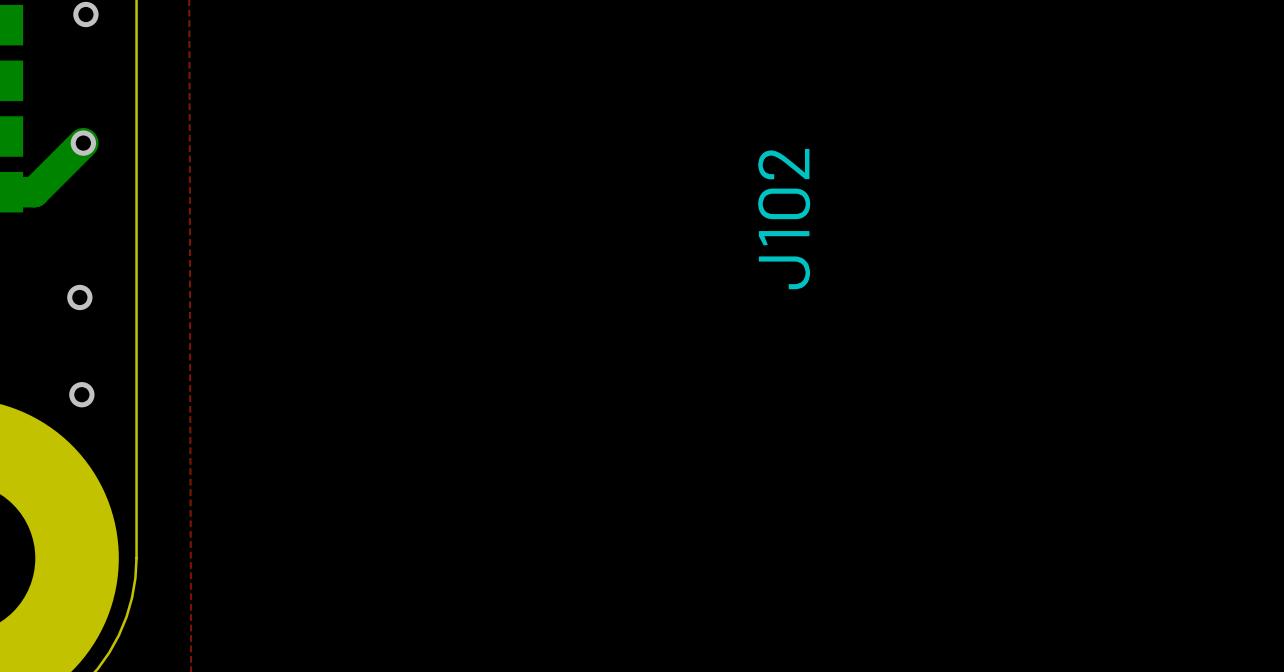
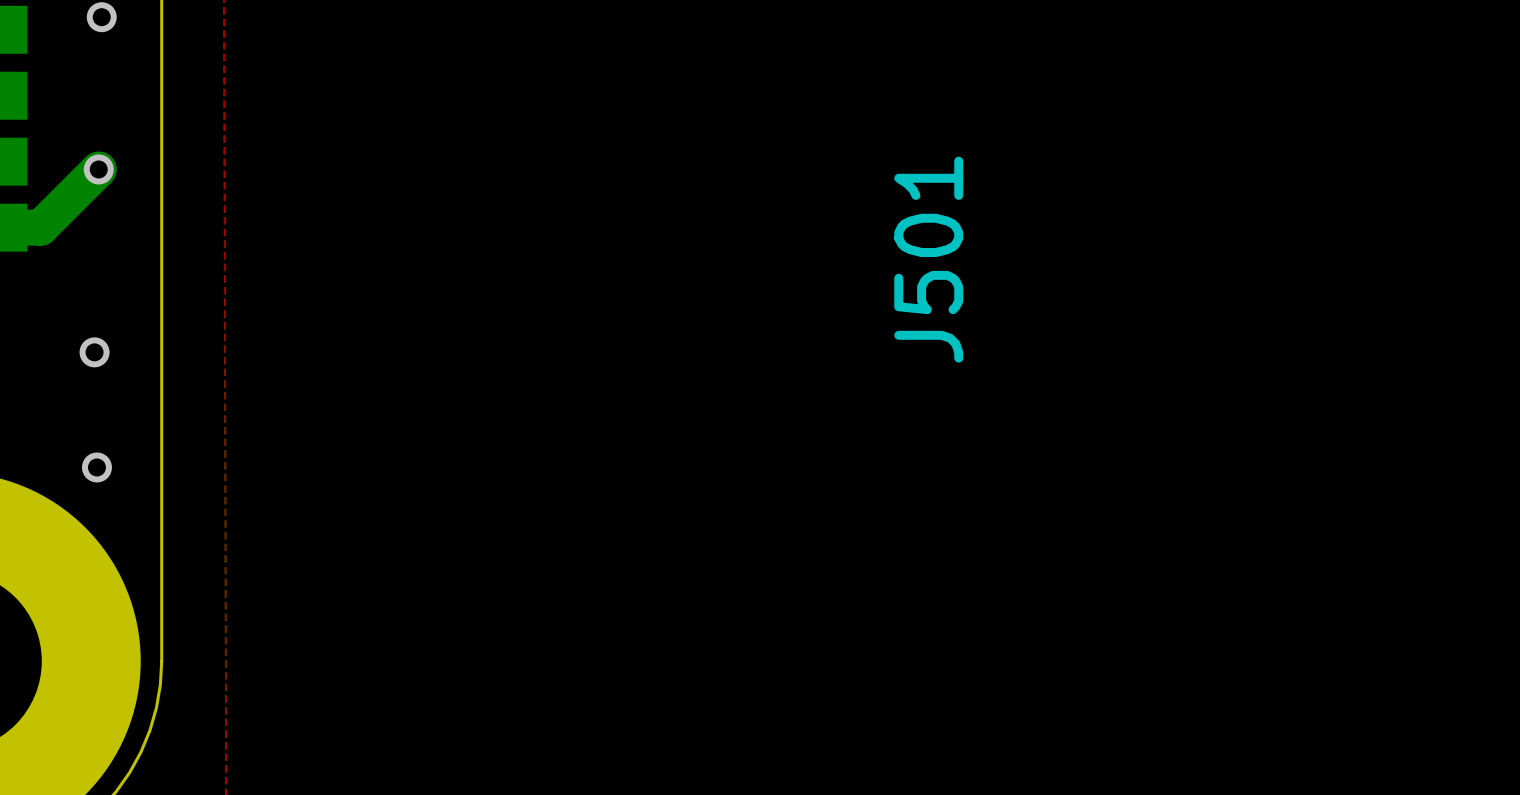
J102 name: J102 (784, 219) -> J501 (928, 259)

